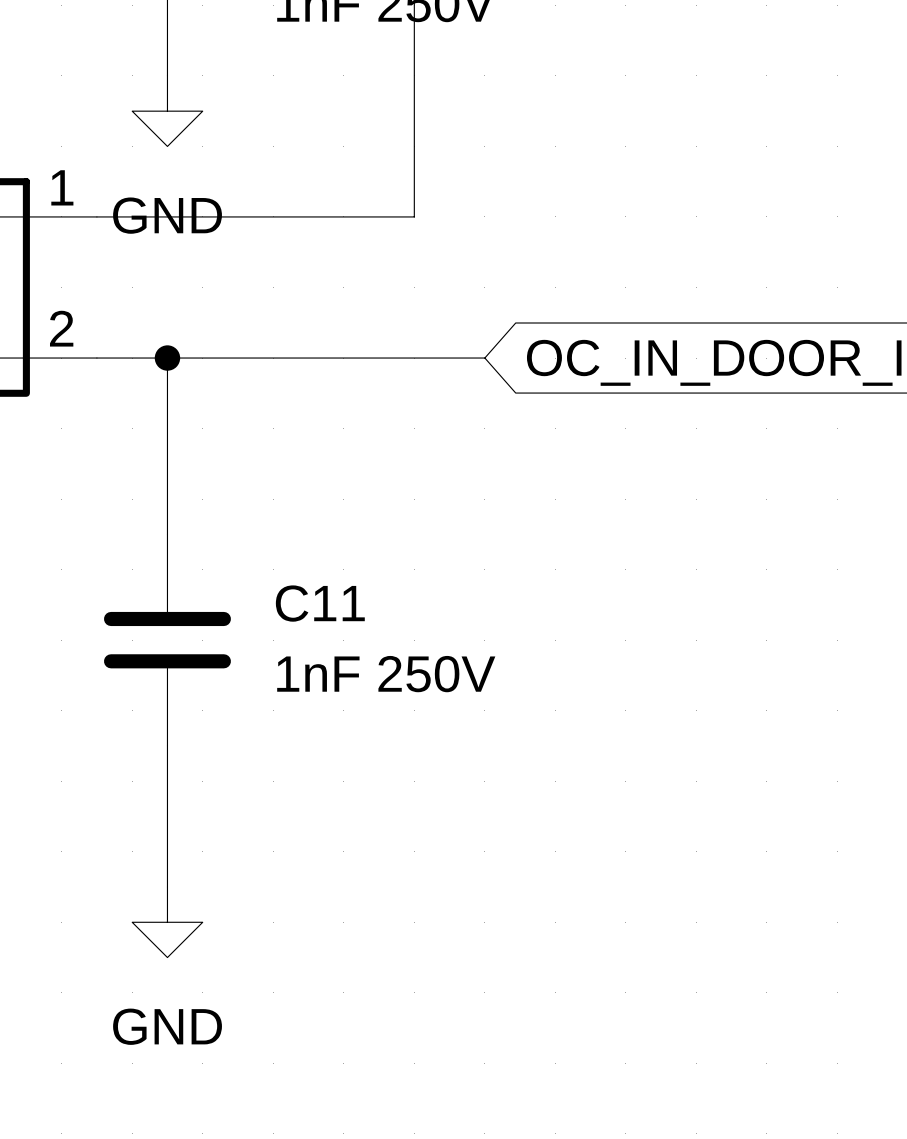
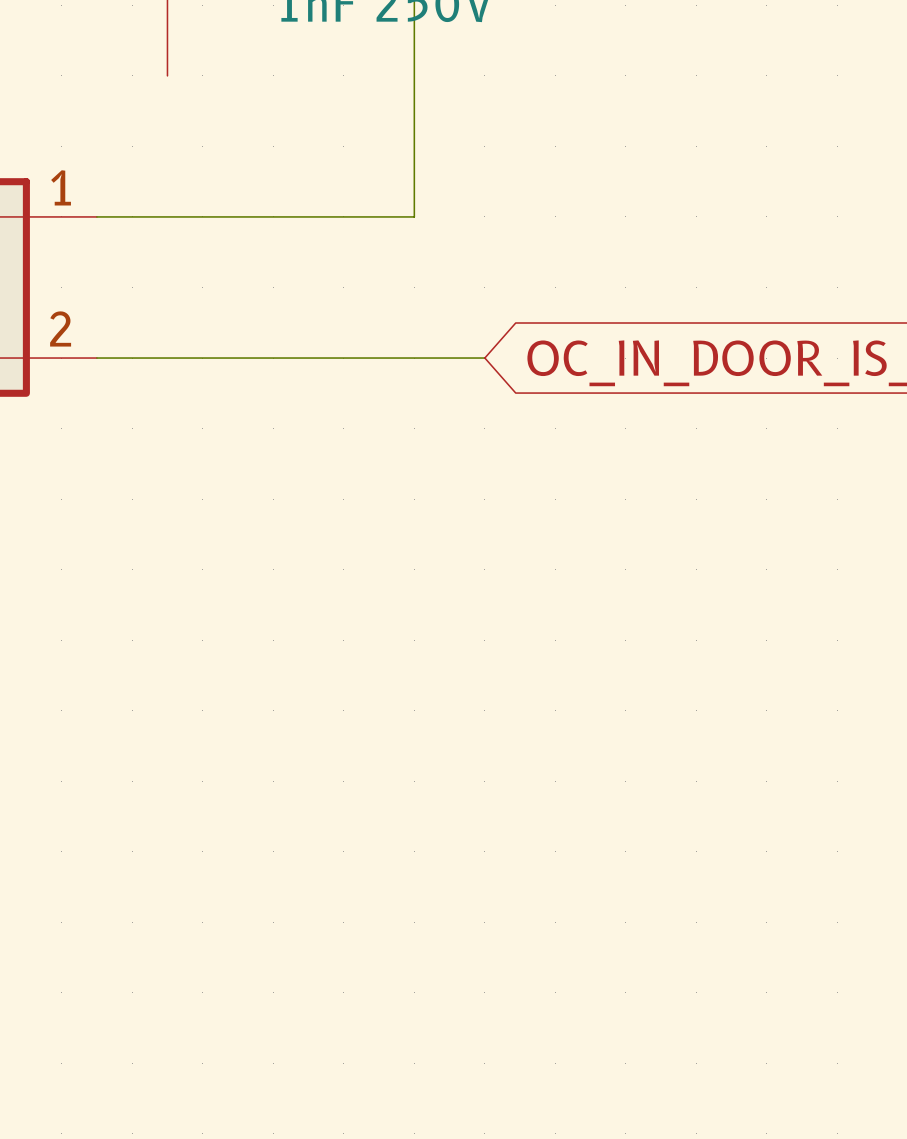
power symbol: GND (167, 111) -> none
wire: (167, 358) (167, 534) -> none
junction: (167, 358) -> none
C11: 1nF 250V (167, 640) -> none
wire: (167, 745) (167, 887) -> none
power symbol: GND (167, 922) -> none

